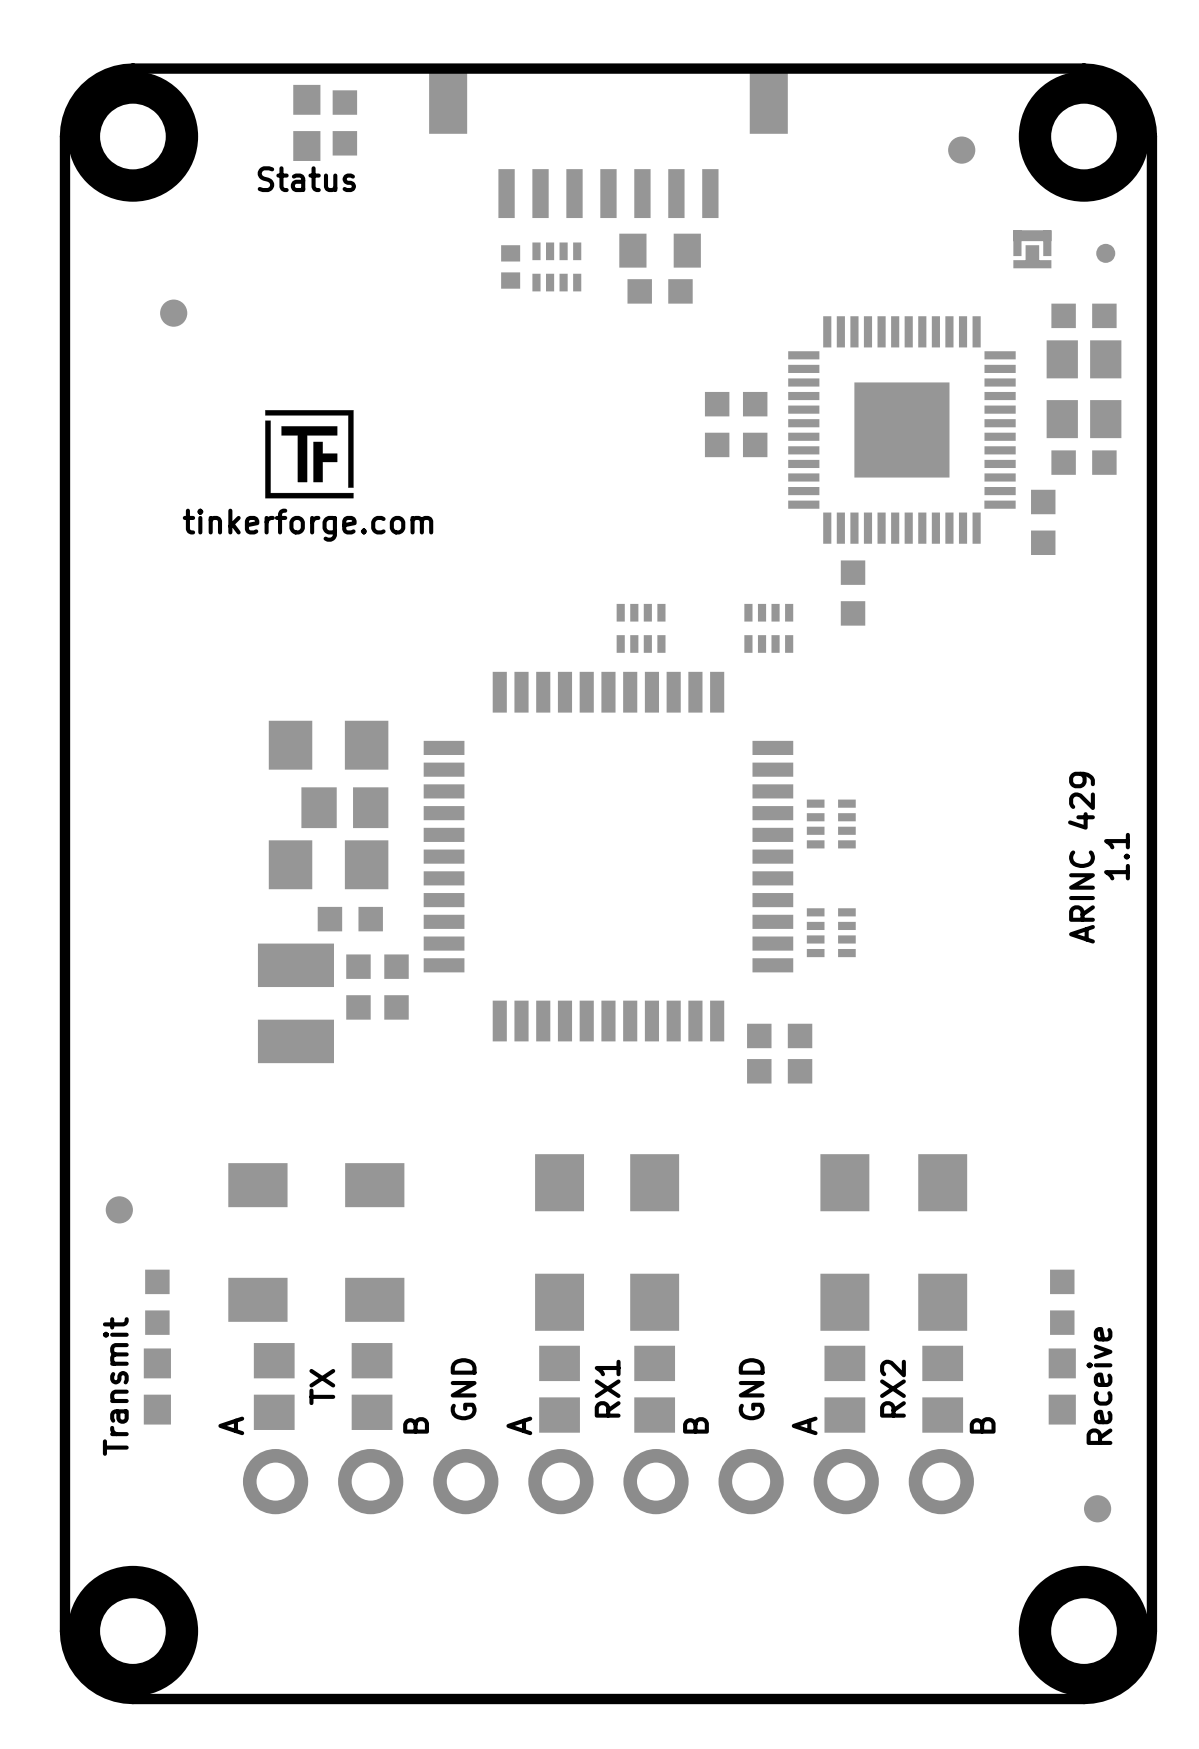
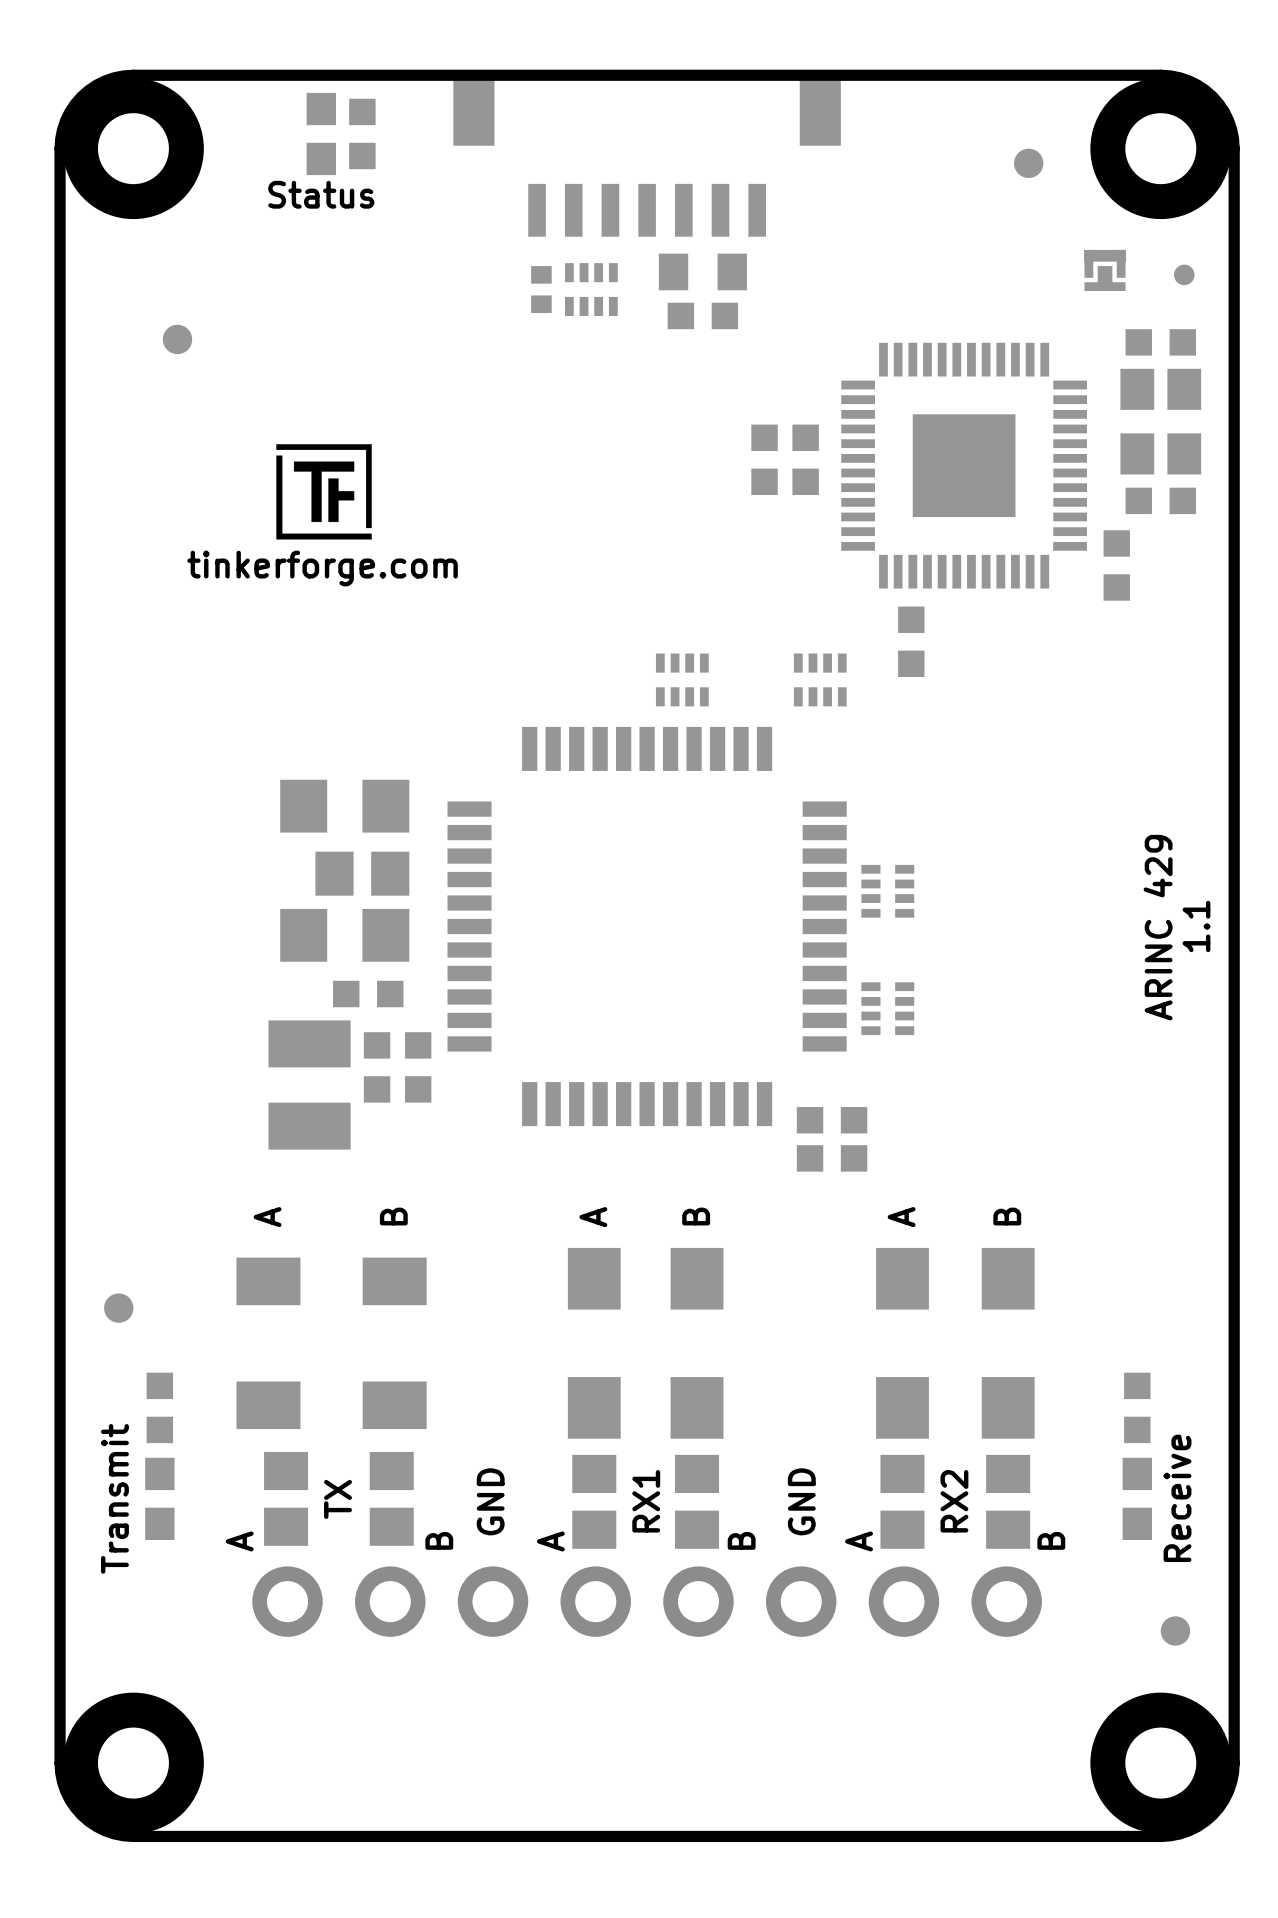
text: none -> A (267, 1217)
text: none -> B (393, 1216)
text: none -> A (593, 1217)
text: none -> B (696, 1216)
text: none -> A (901, 1217)
text: none -> B (1007, 1216)

